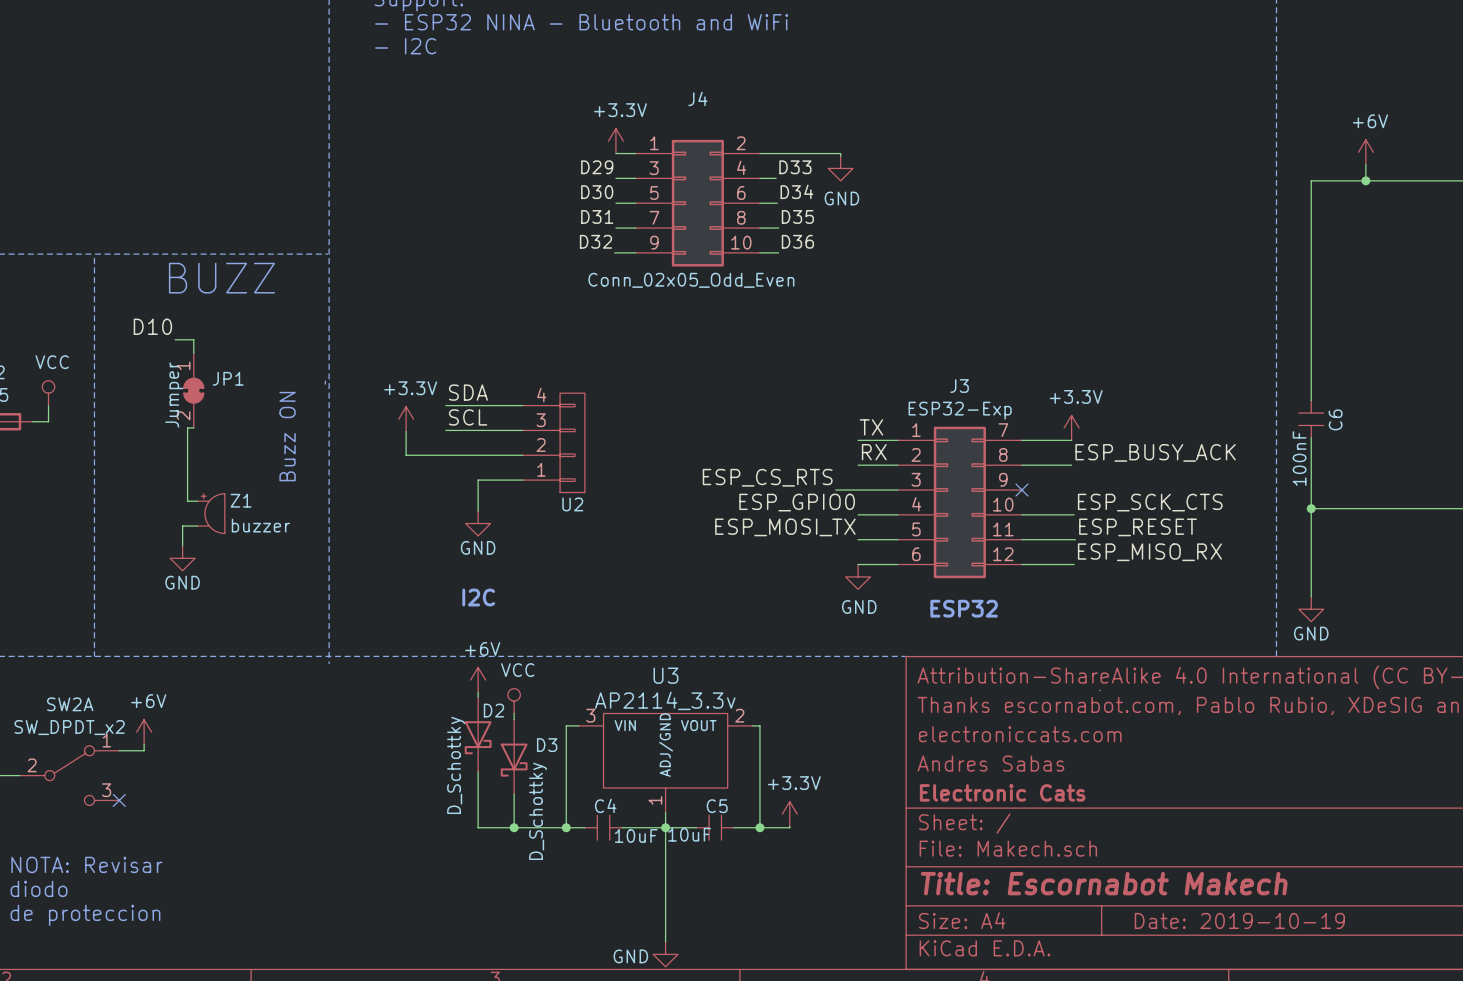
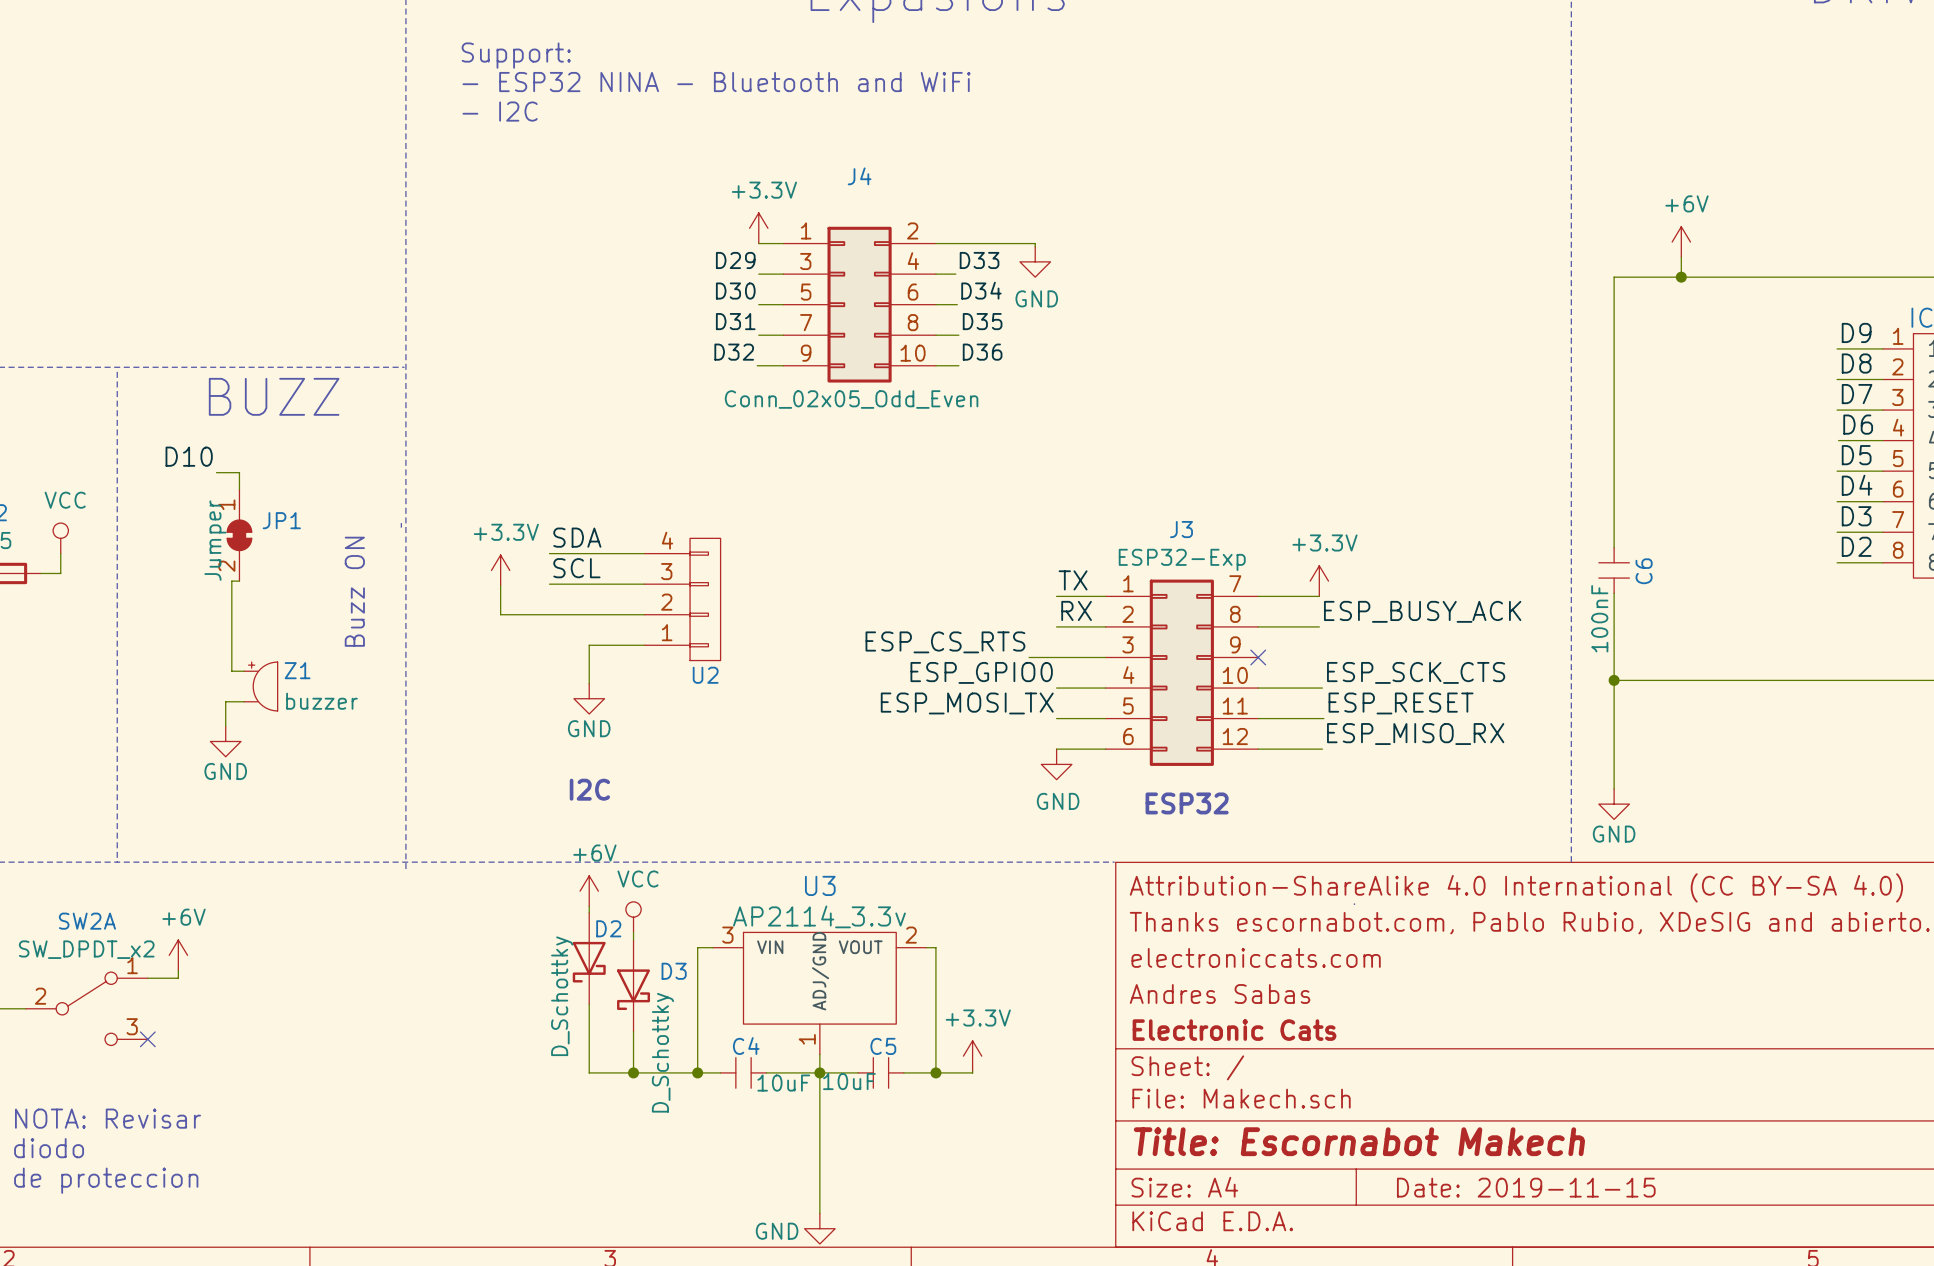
title block: Date: 2019-10-19 (1239, 920) -> Date: 2019-11-15 (1526, 1187)

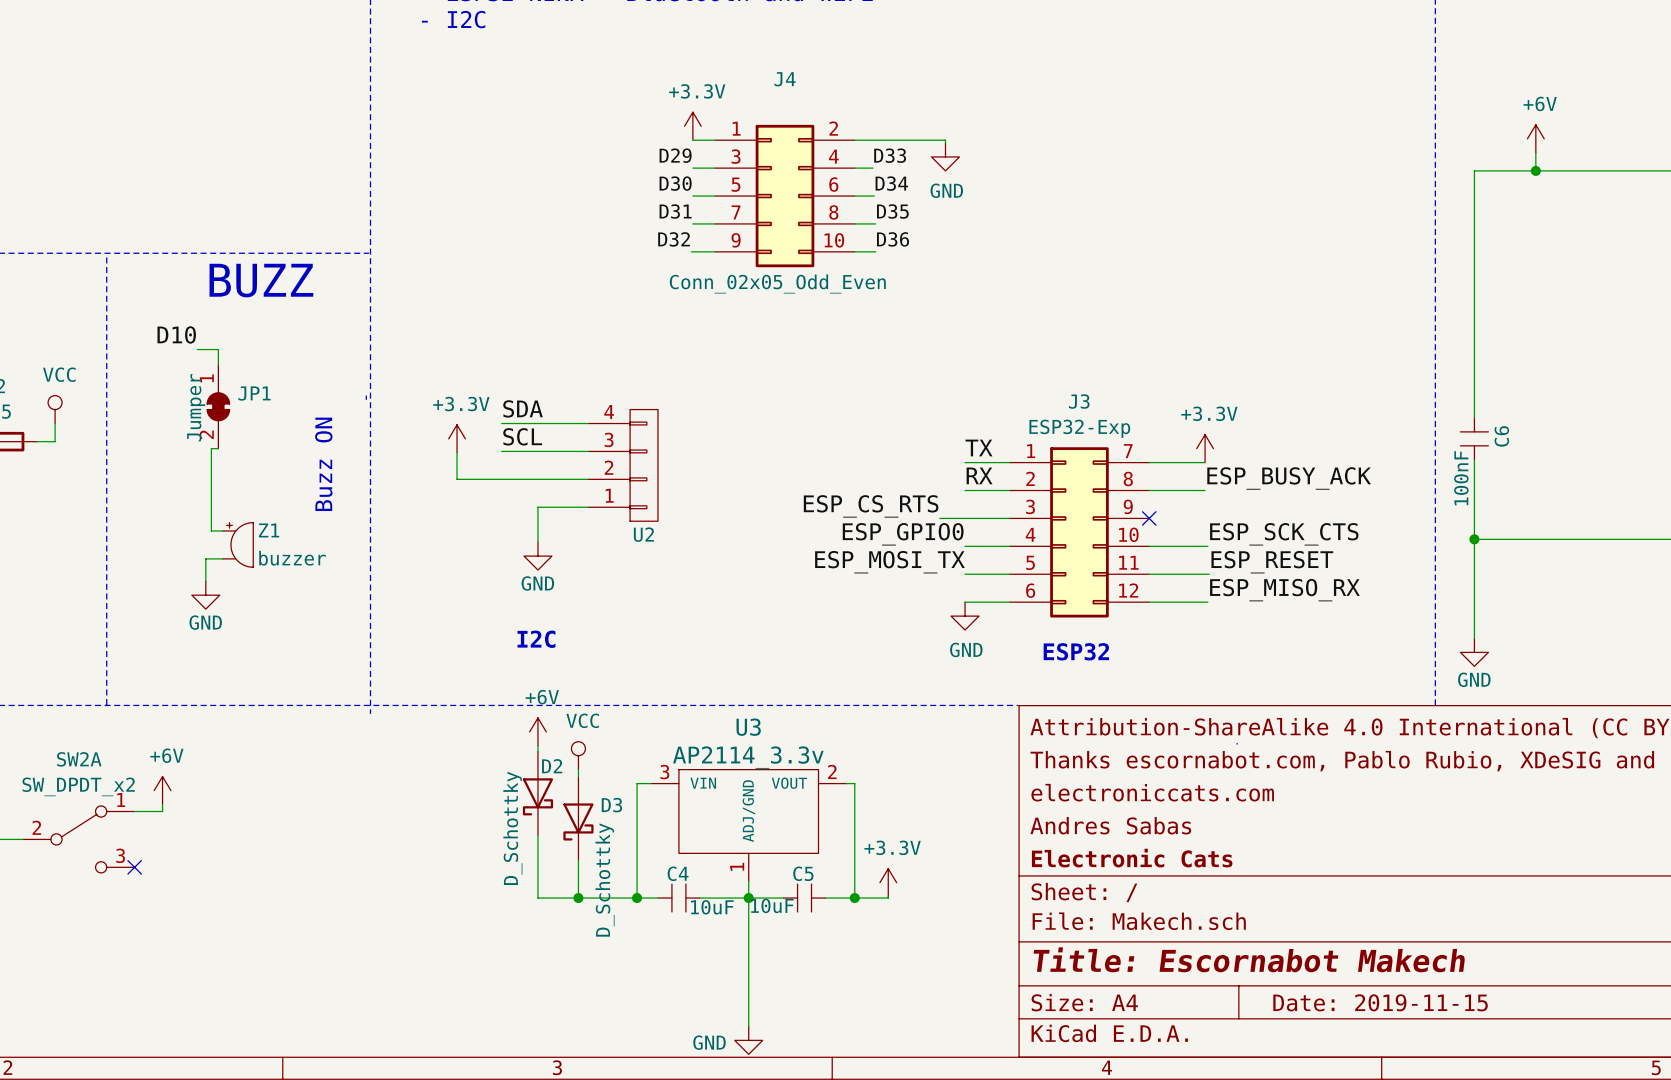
text: NOTA: Revisar (107, 1118) -> none
text: diodo (49, 1148) -> none
text: de proteccion (106, 1180) -> none

